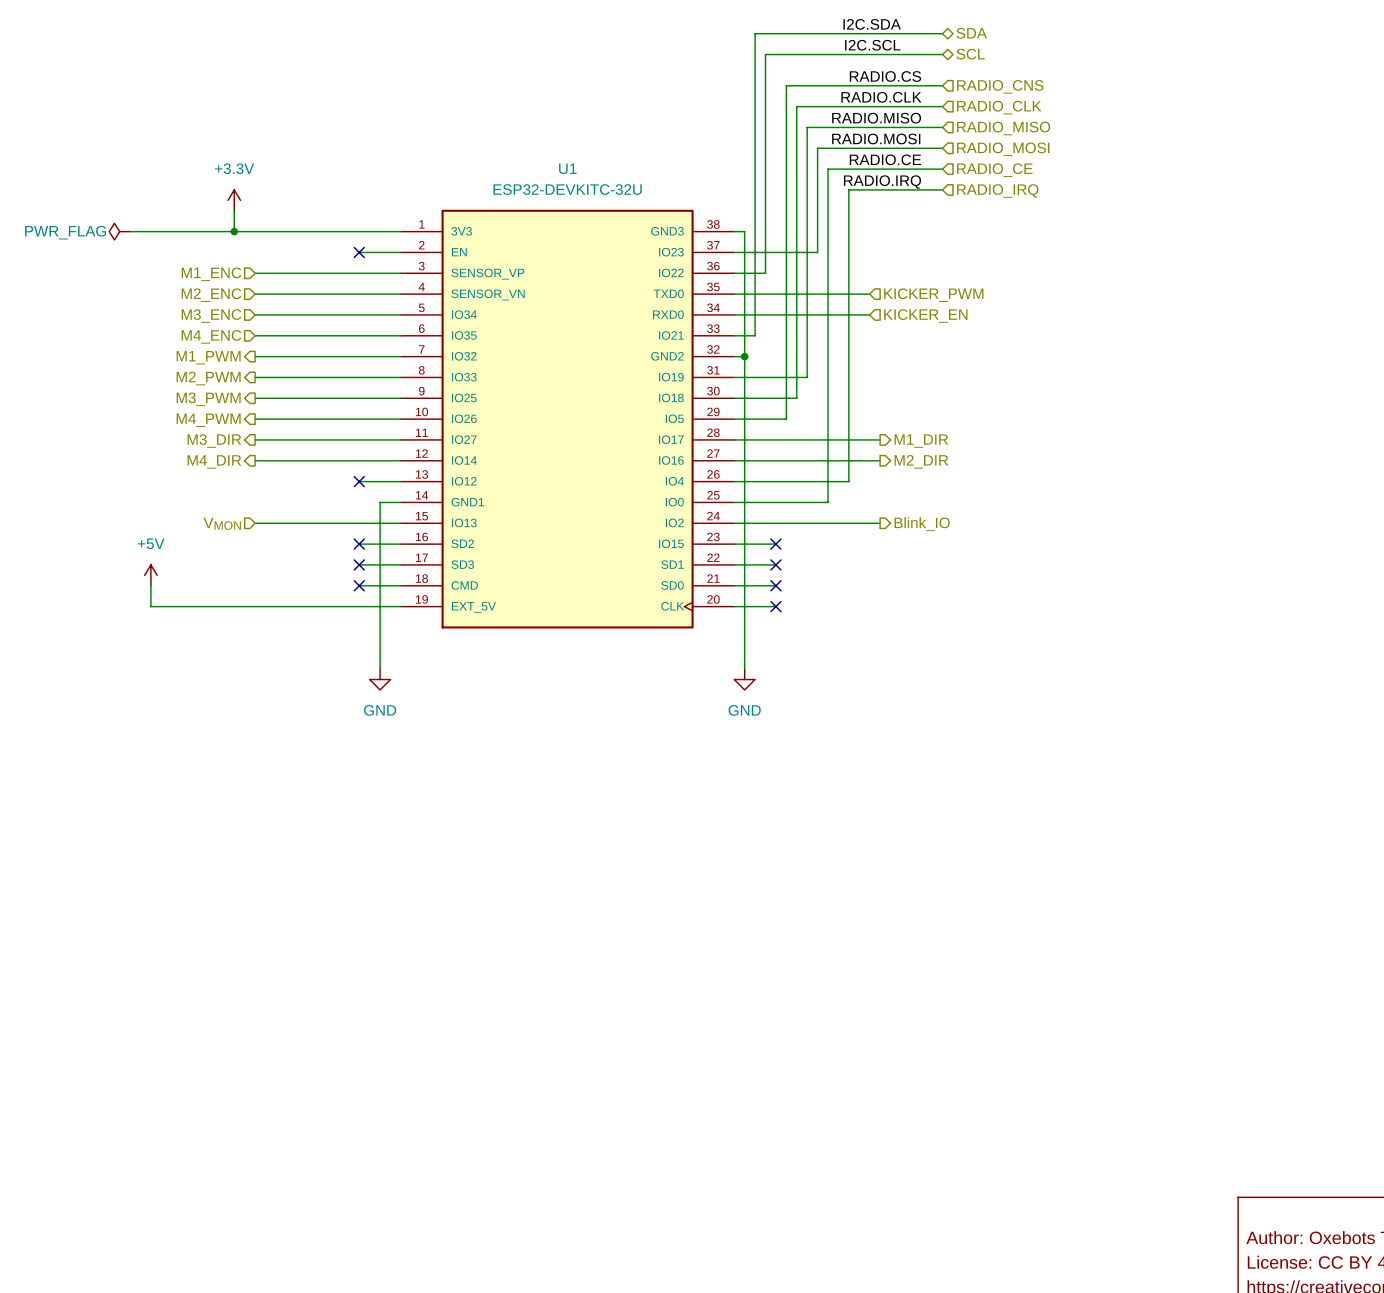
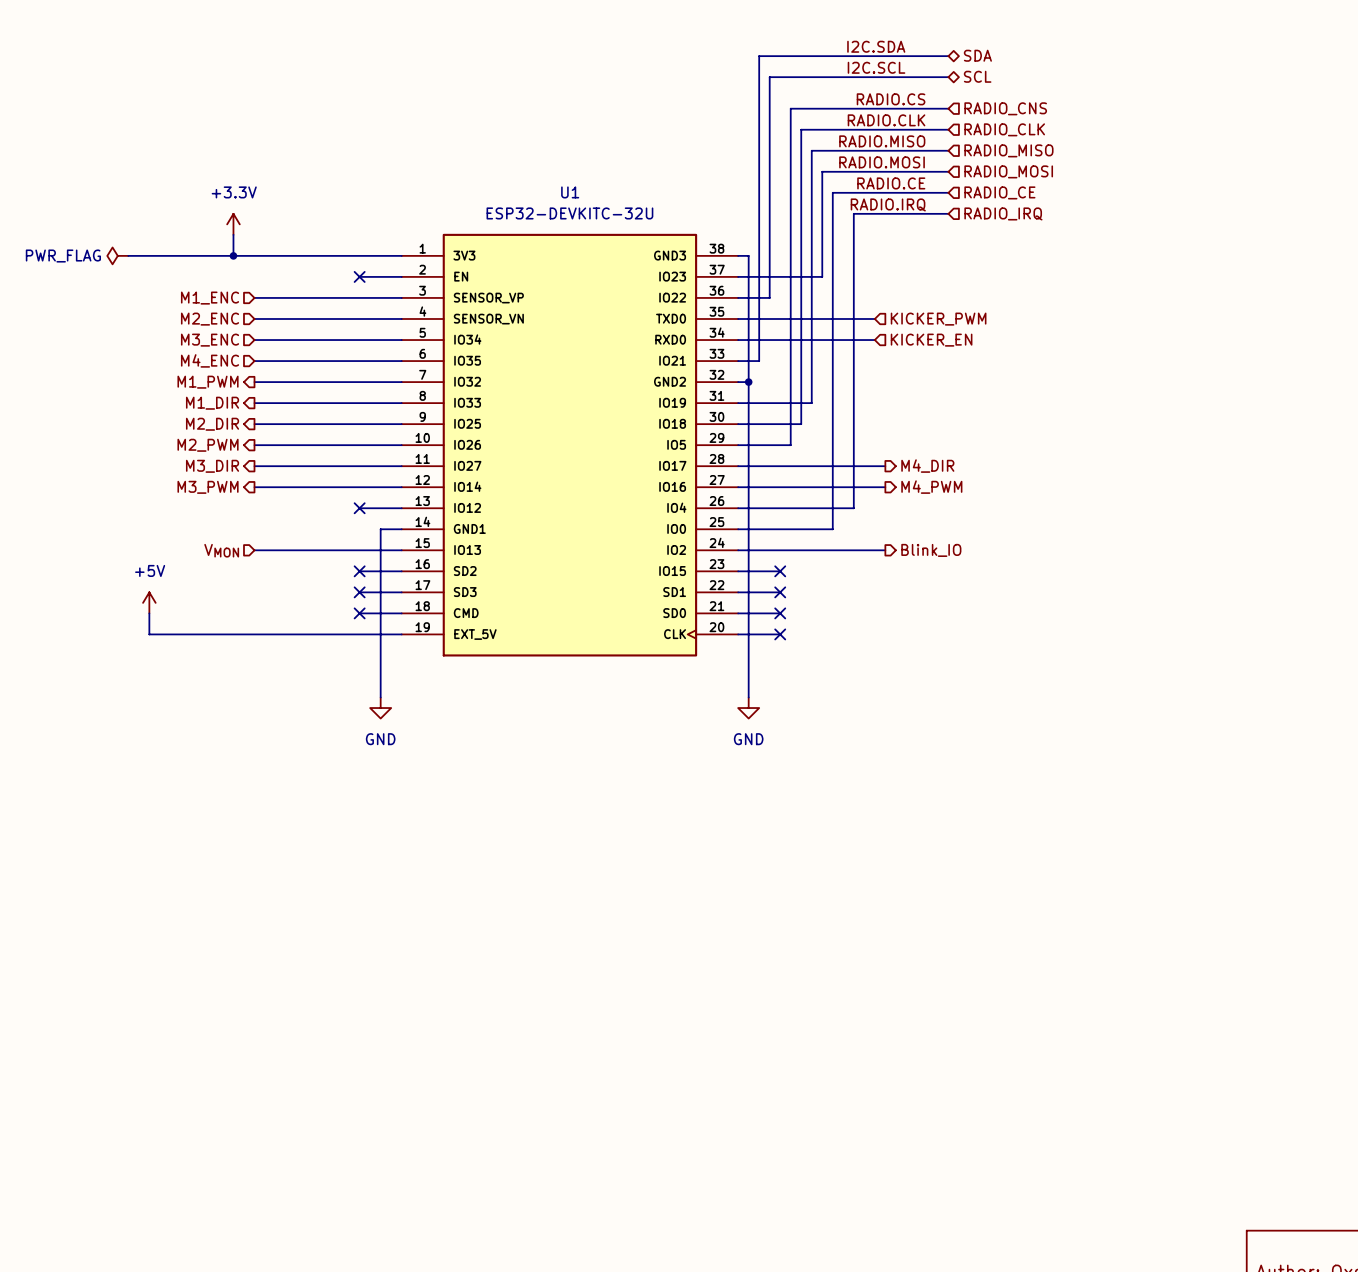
hierarchical label: M2_PWM (208, 378) -> M1_DIR (212, 403)
hierarchical label: M3_PWM (208, 399) -> M2_DIR (212, 424)
hierarchical label: M4_PWM (208, 420) -> M2_PWM (208, 445)
hierarchical label: M1_DIR (921, 441) -> M4_DIR (927, 466)
hierarchical label: M4_DIR (214, 461) -> M3_PWM (208, 487)
hierarchical label: M2_DIR (921, 461) -> M4_PWM (931, 487)

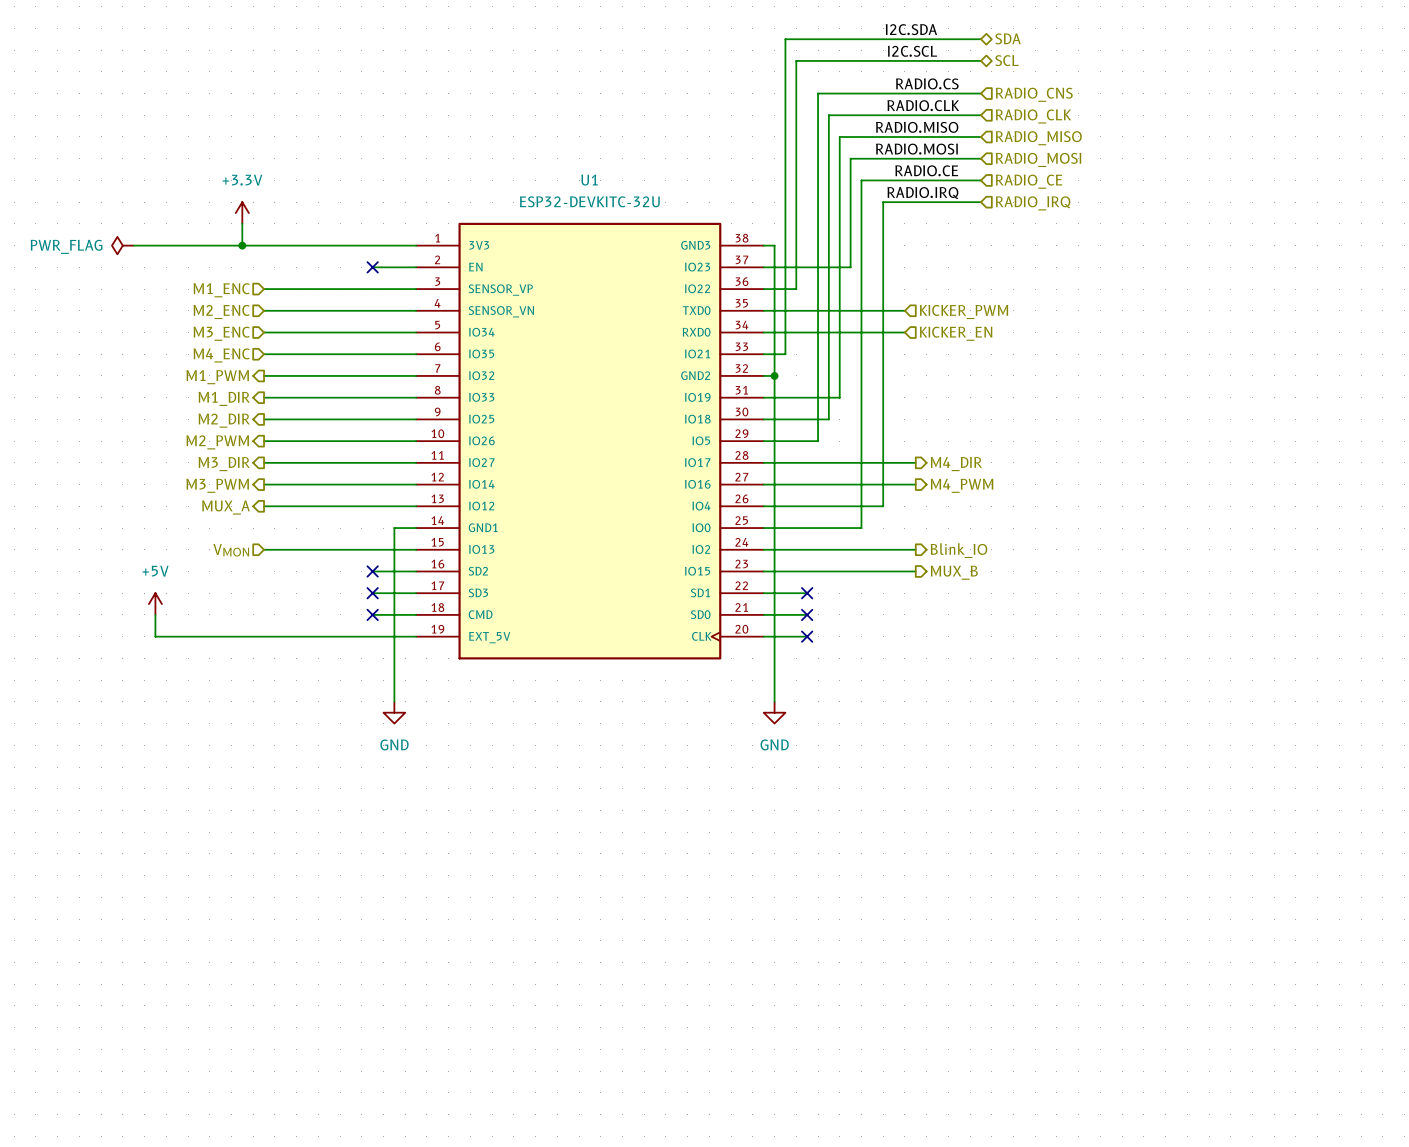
hierarchical label: none -> MUX_A (225, 507)
wire: none -> (264, 506) (372, 506)
no-connect mark: (359, 508) -> none
wire: none -> (807, 571) (915, 571)
no-connect mark: (780, 571) -> none
hierarchical label: none -> MUX_B (954, 572)

